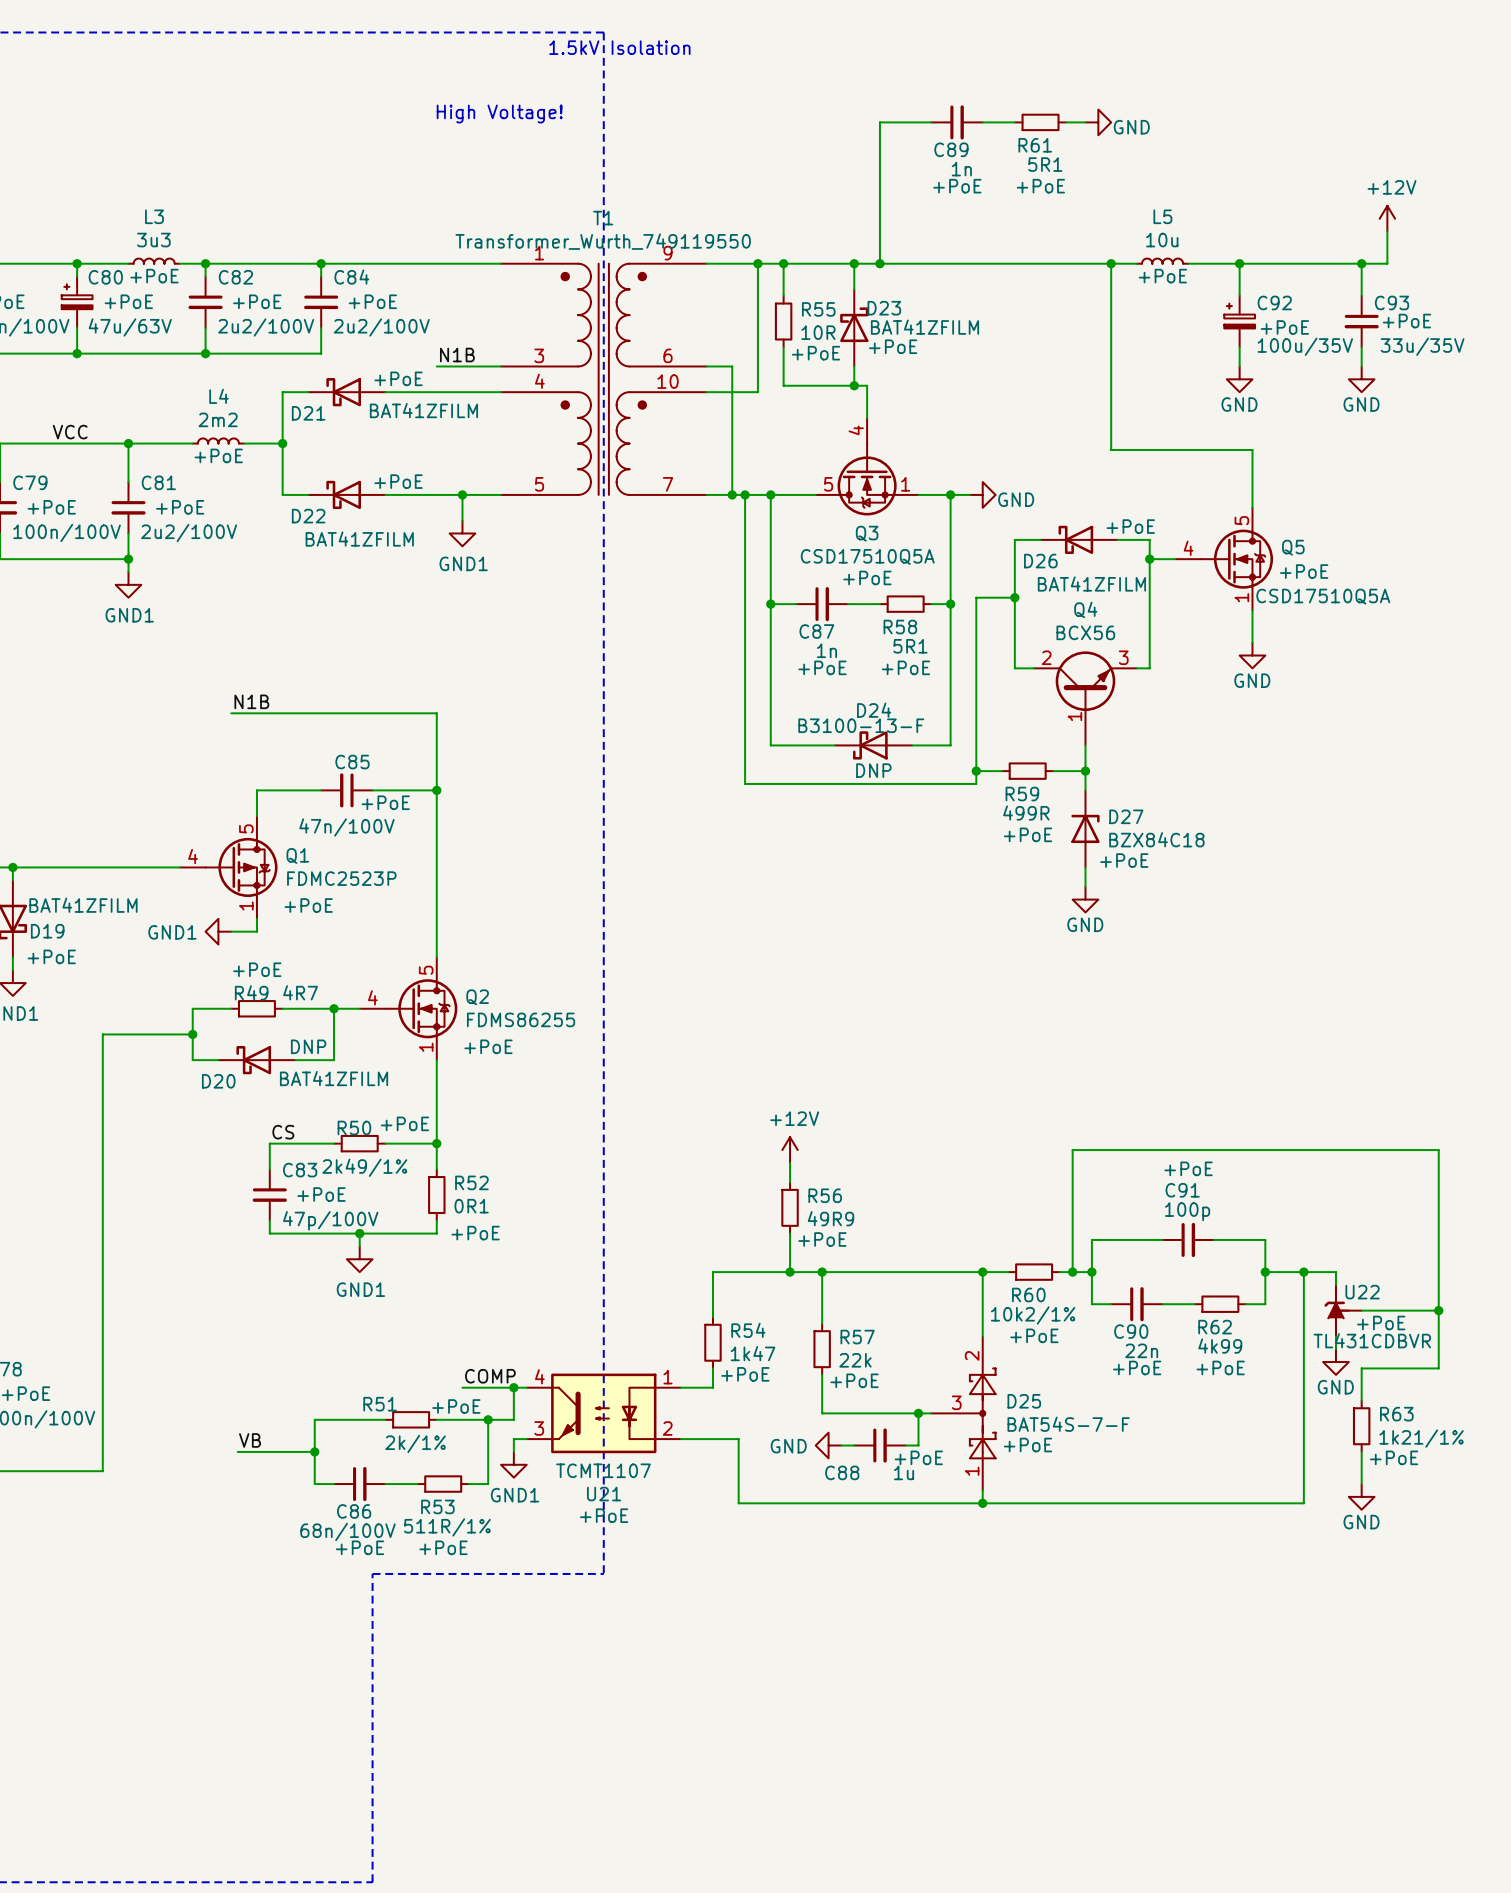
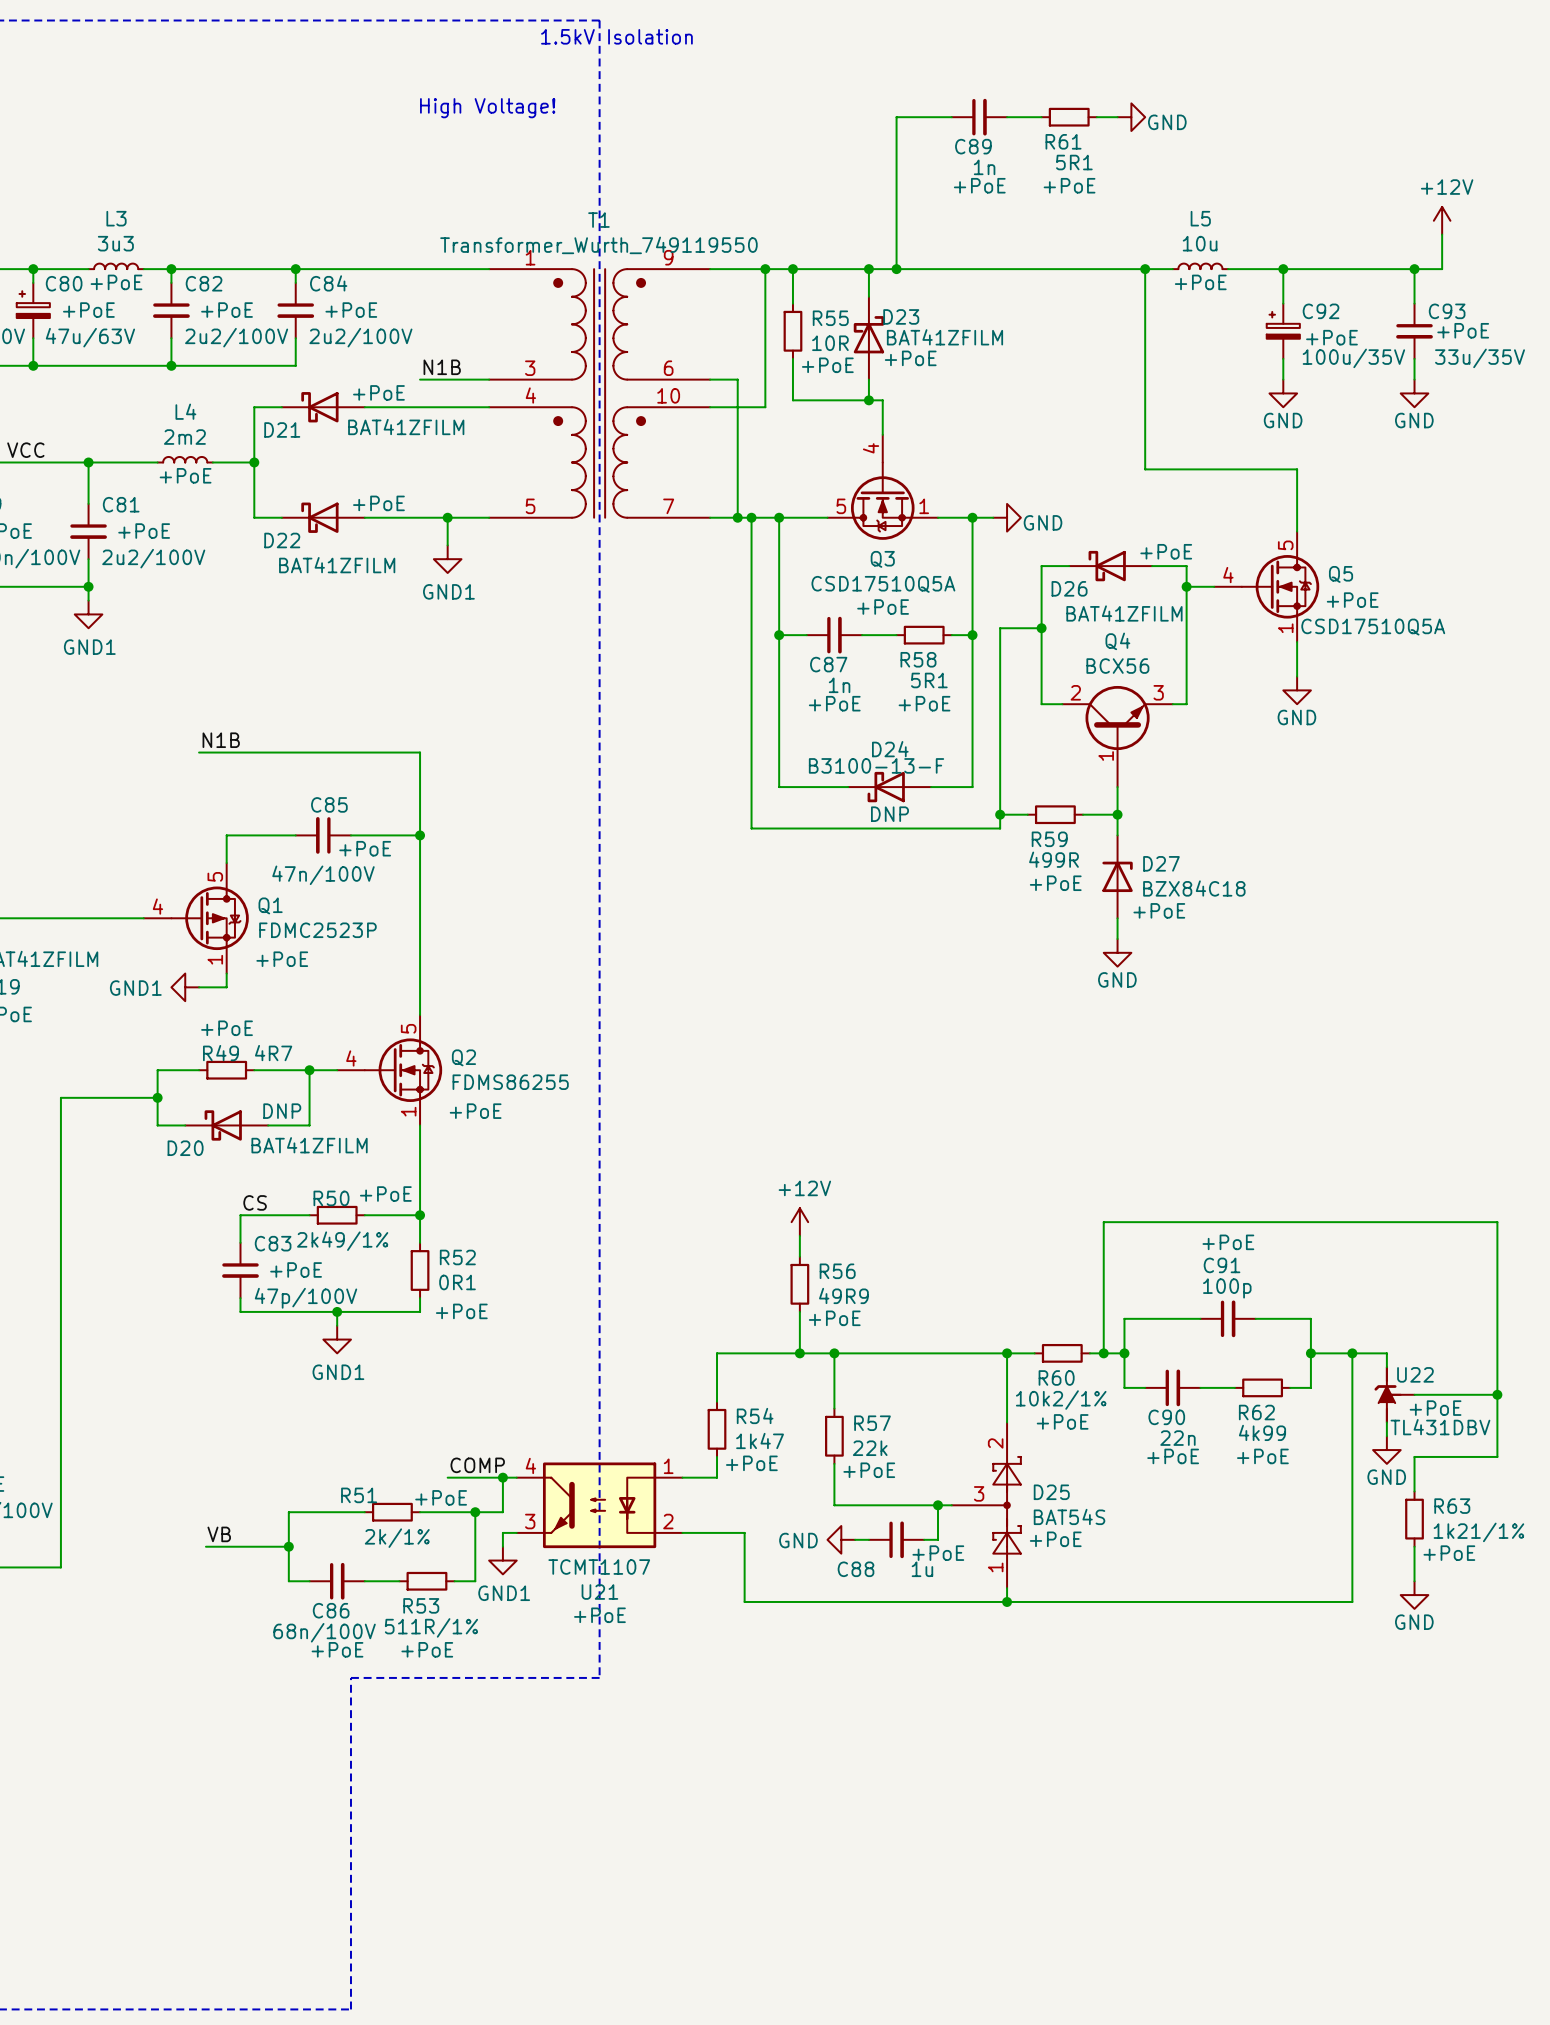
U22 value: TL431CDBVR (1372, 1340) -> TL431DBV (1440, 1427)
D25 value: BAT54S-7-F (1068, 1424) -> BAT54S (1069, 1516)

